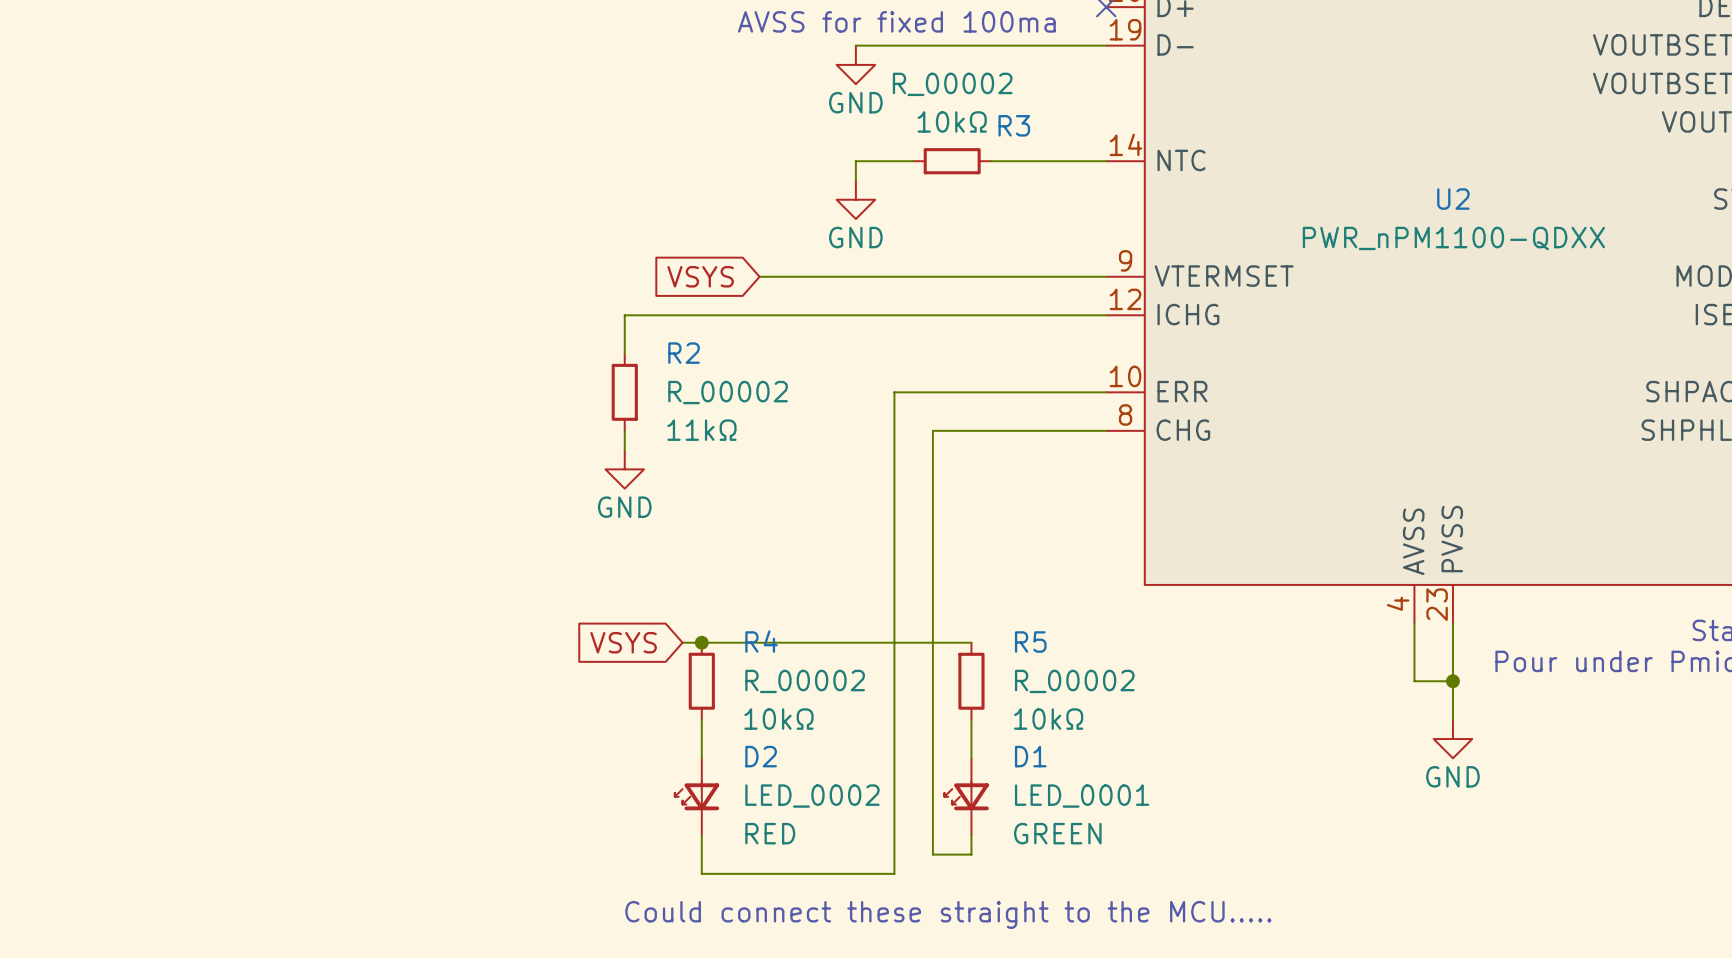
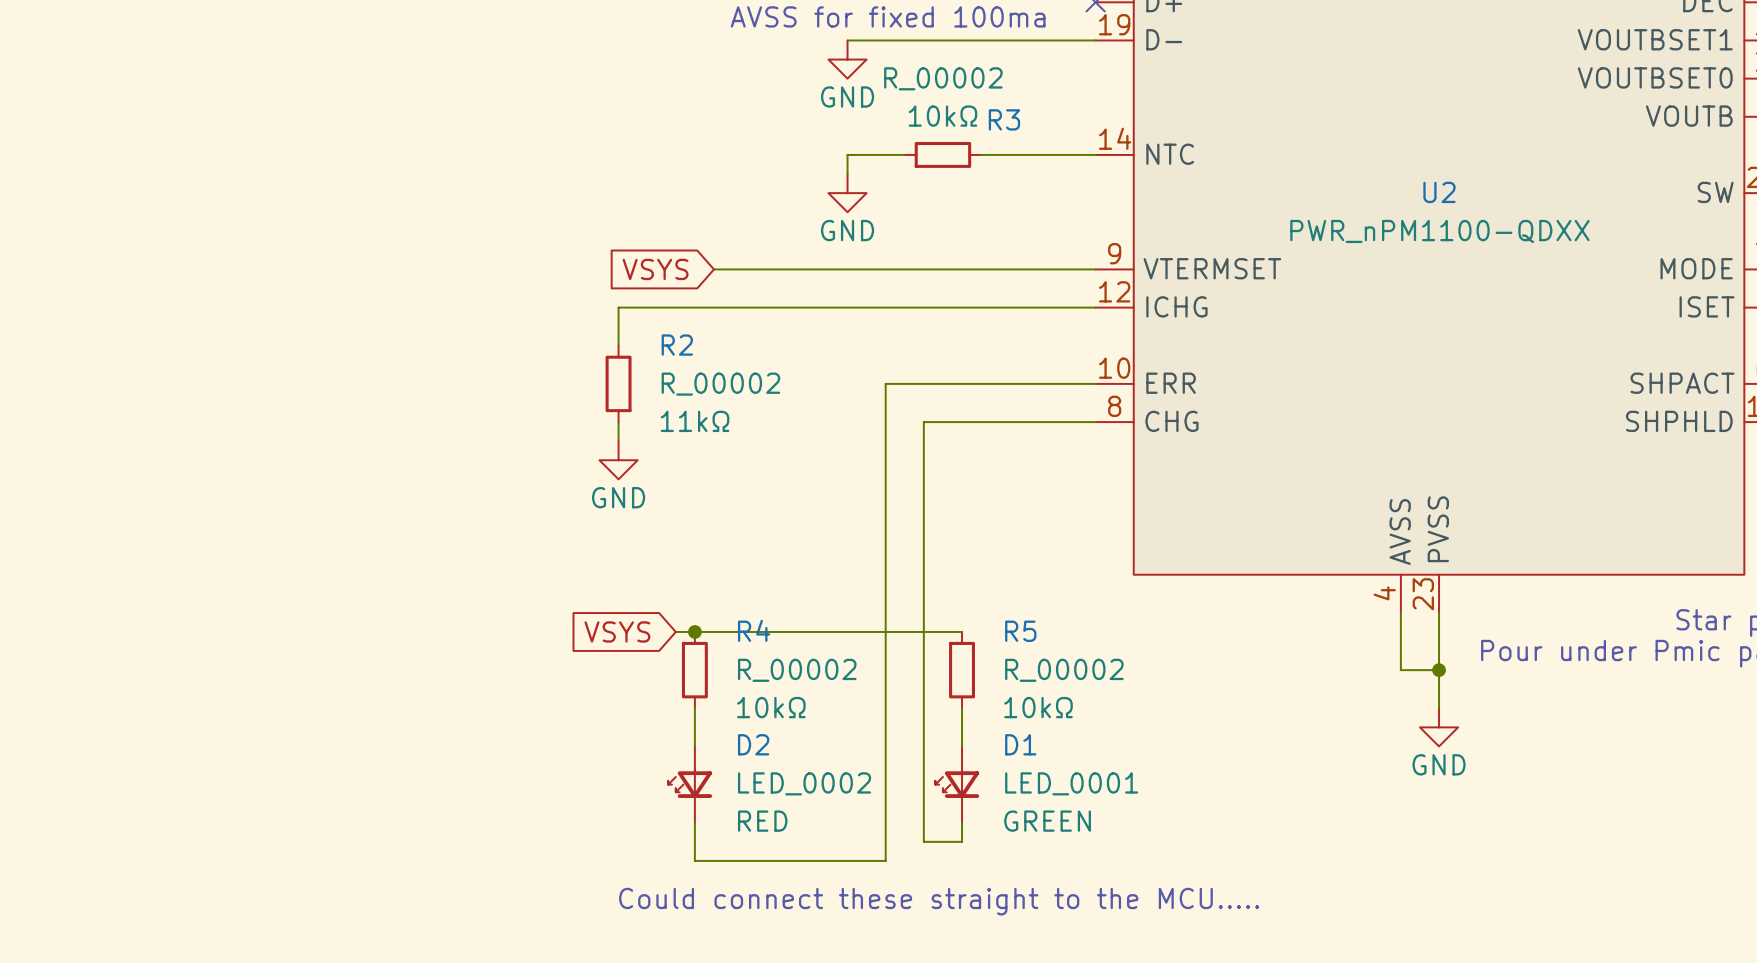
global label position: VSYS (700, 276) -> VSYS (655, 269)
wire: none -> (713, 269) (752, 269)

